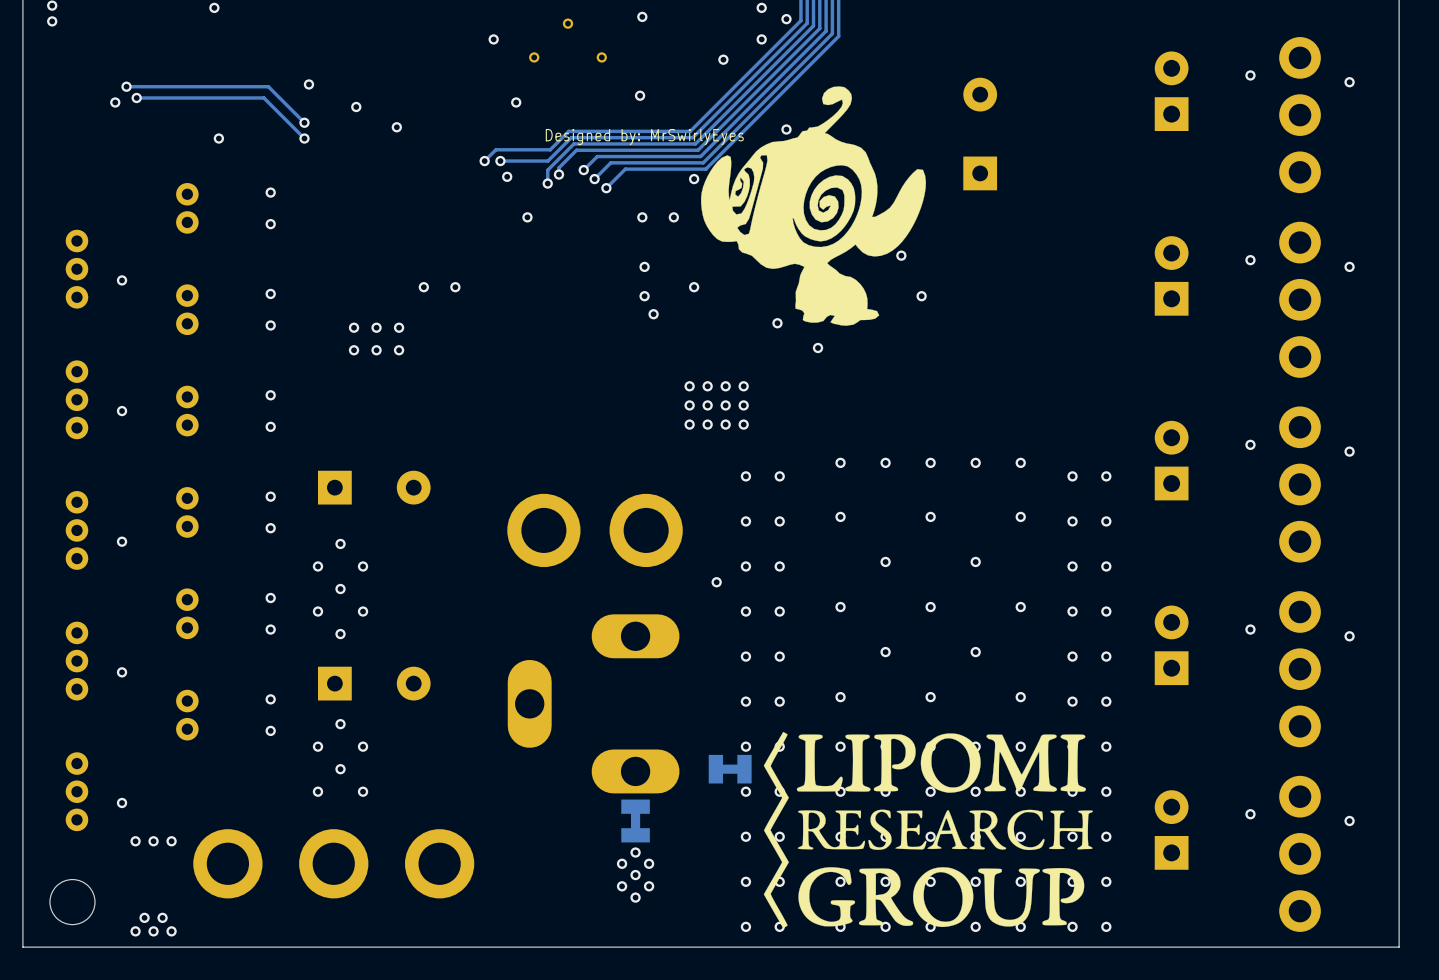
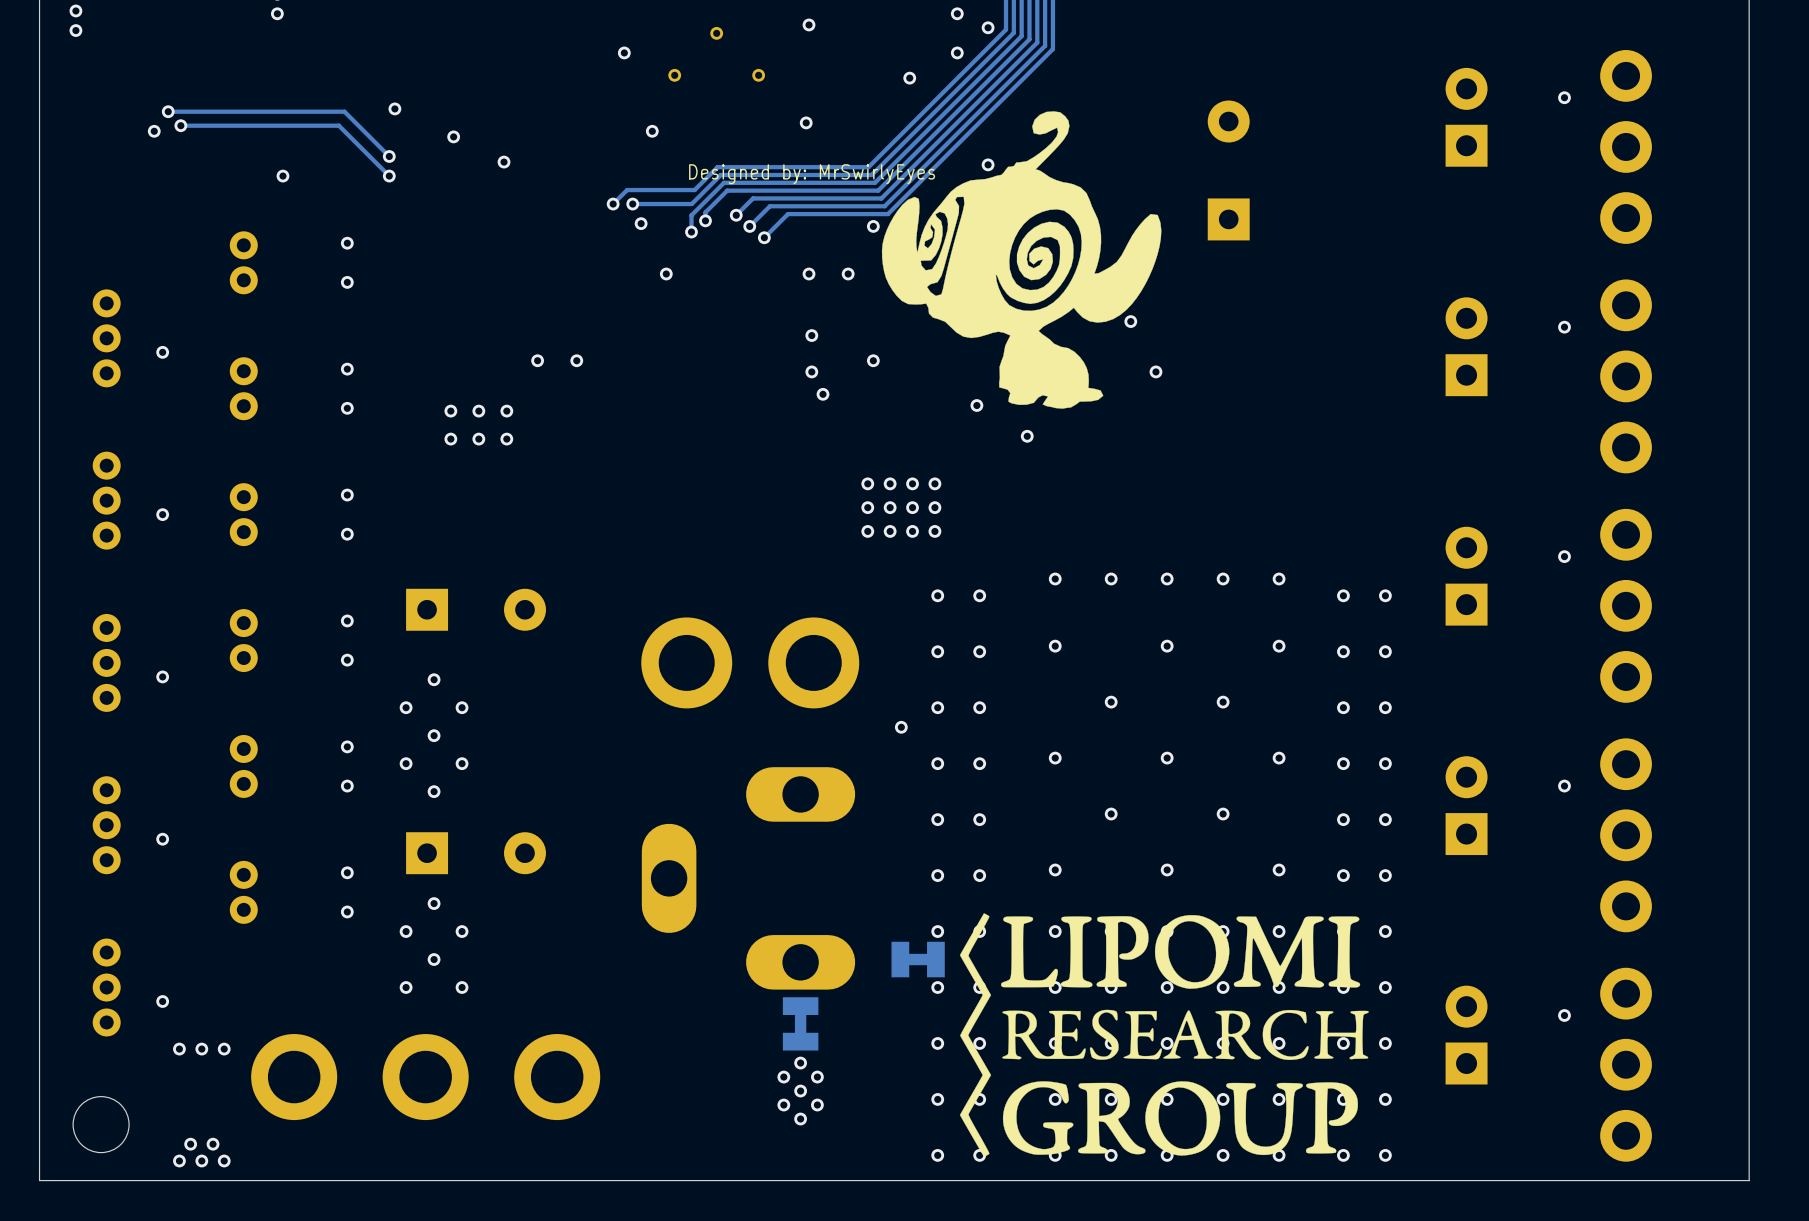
via: (1349, 82) -> none
via: (1349, 266) -> none
via: (1349, 451) -> none
via: (1349, 636) -> none
via: (1349, 820) -> none

